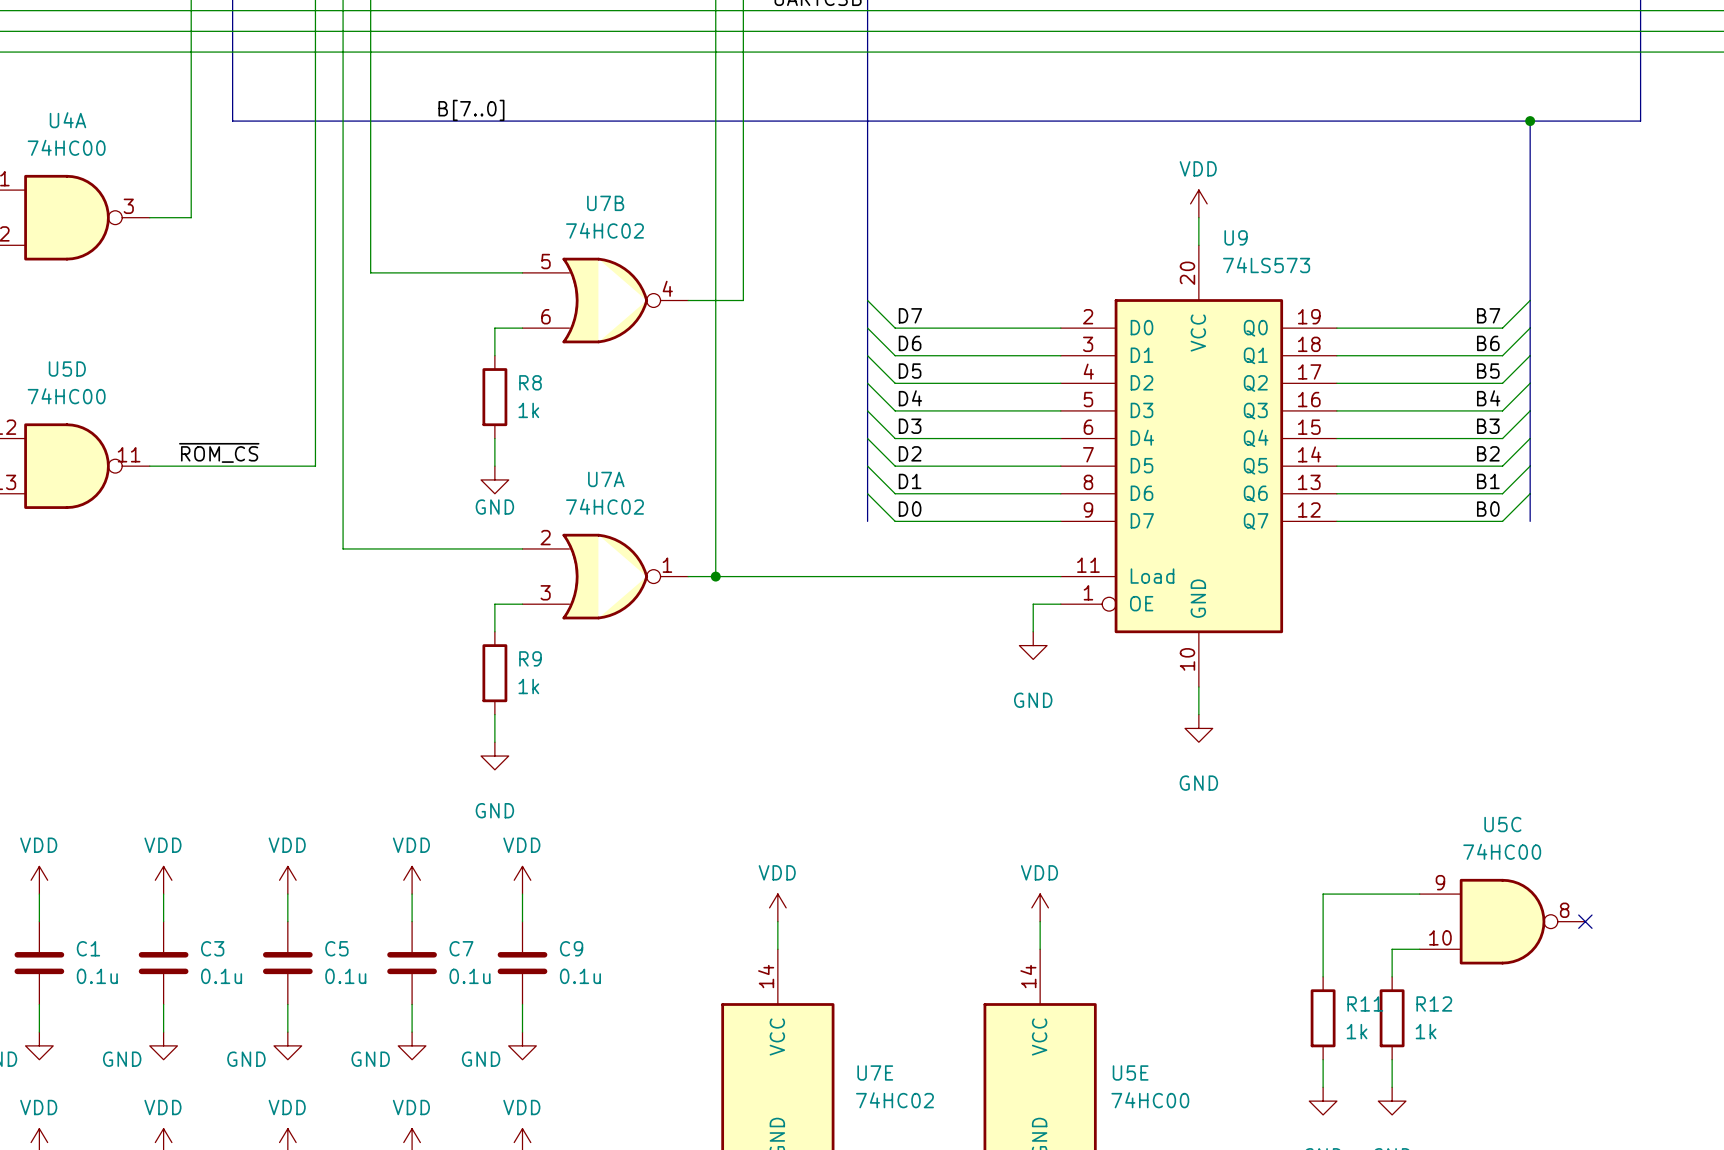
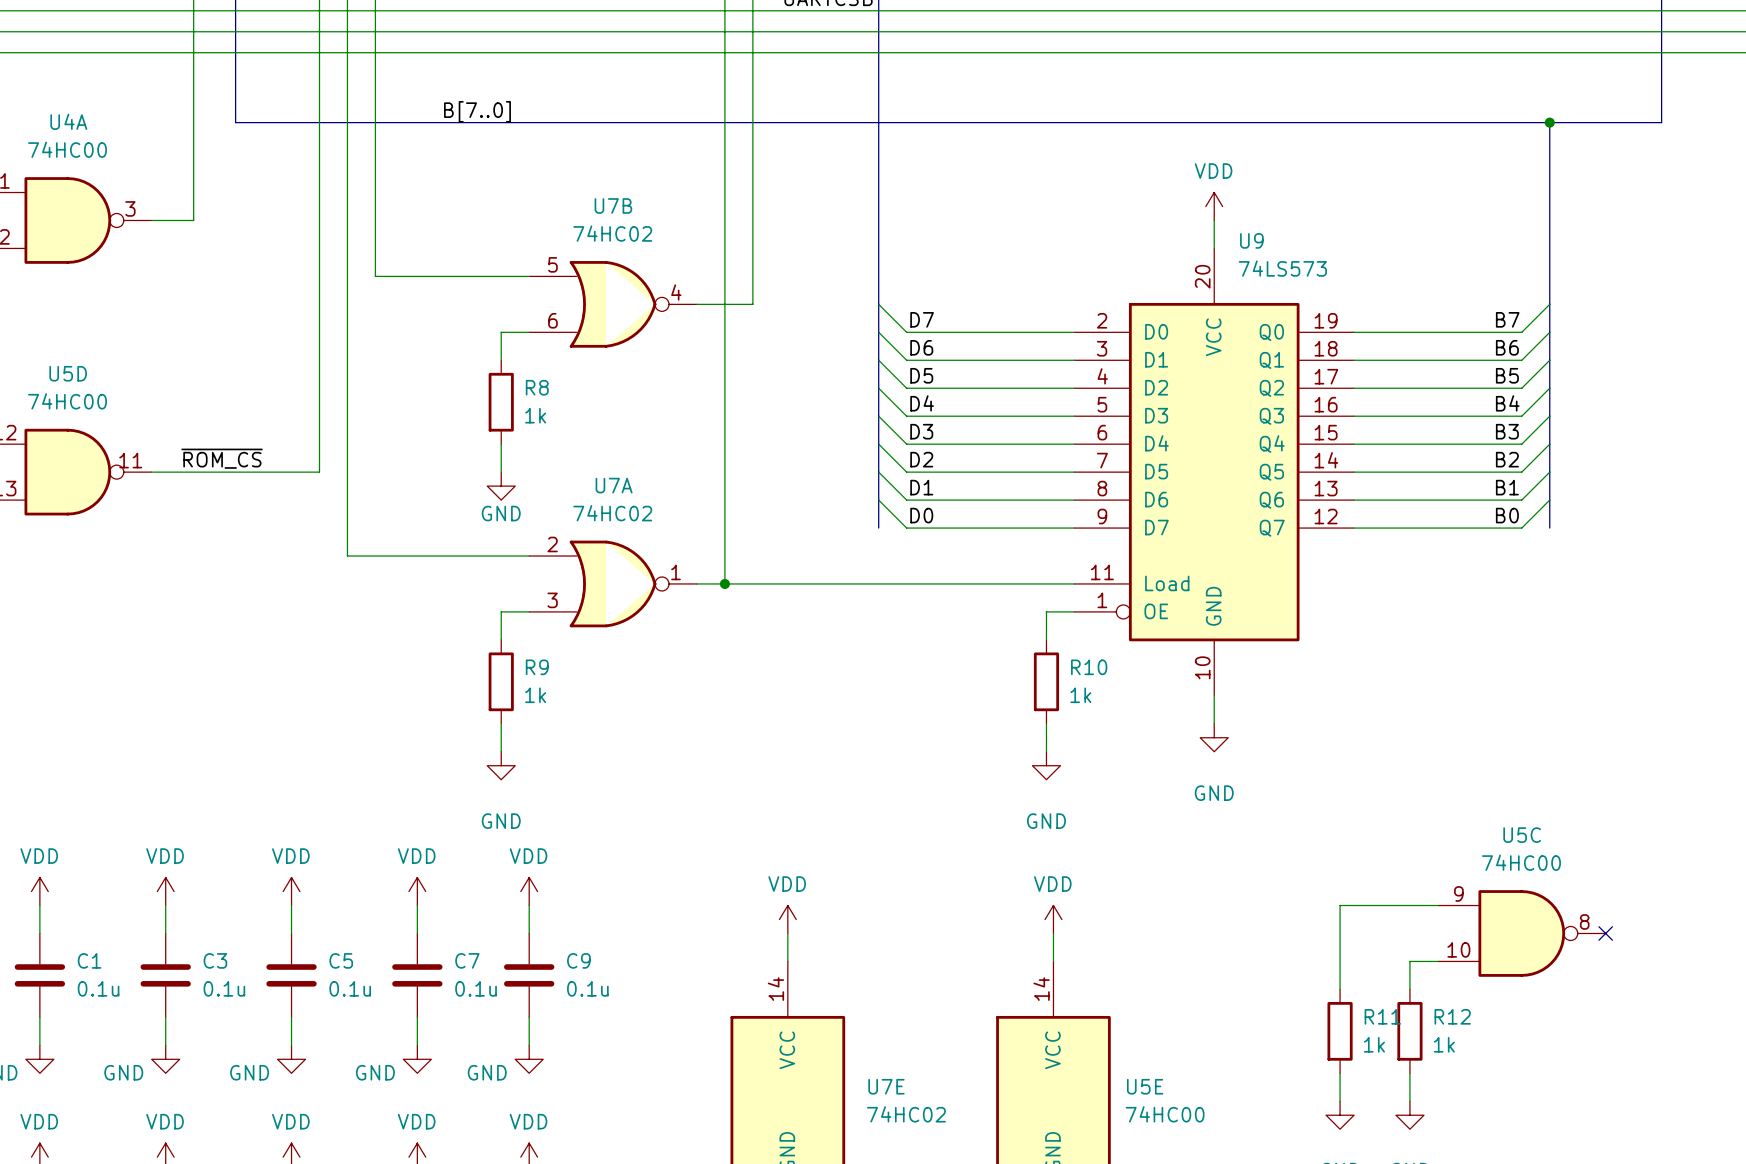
power symbol position: GND (1033, 645) -> GND (1046, 765)
R10: none -> 1k (1046, 681)
wire: none -> (1046, 723) (1046, 751)

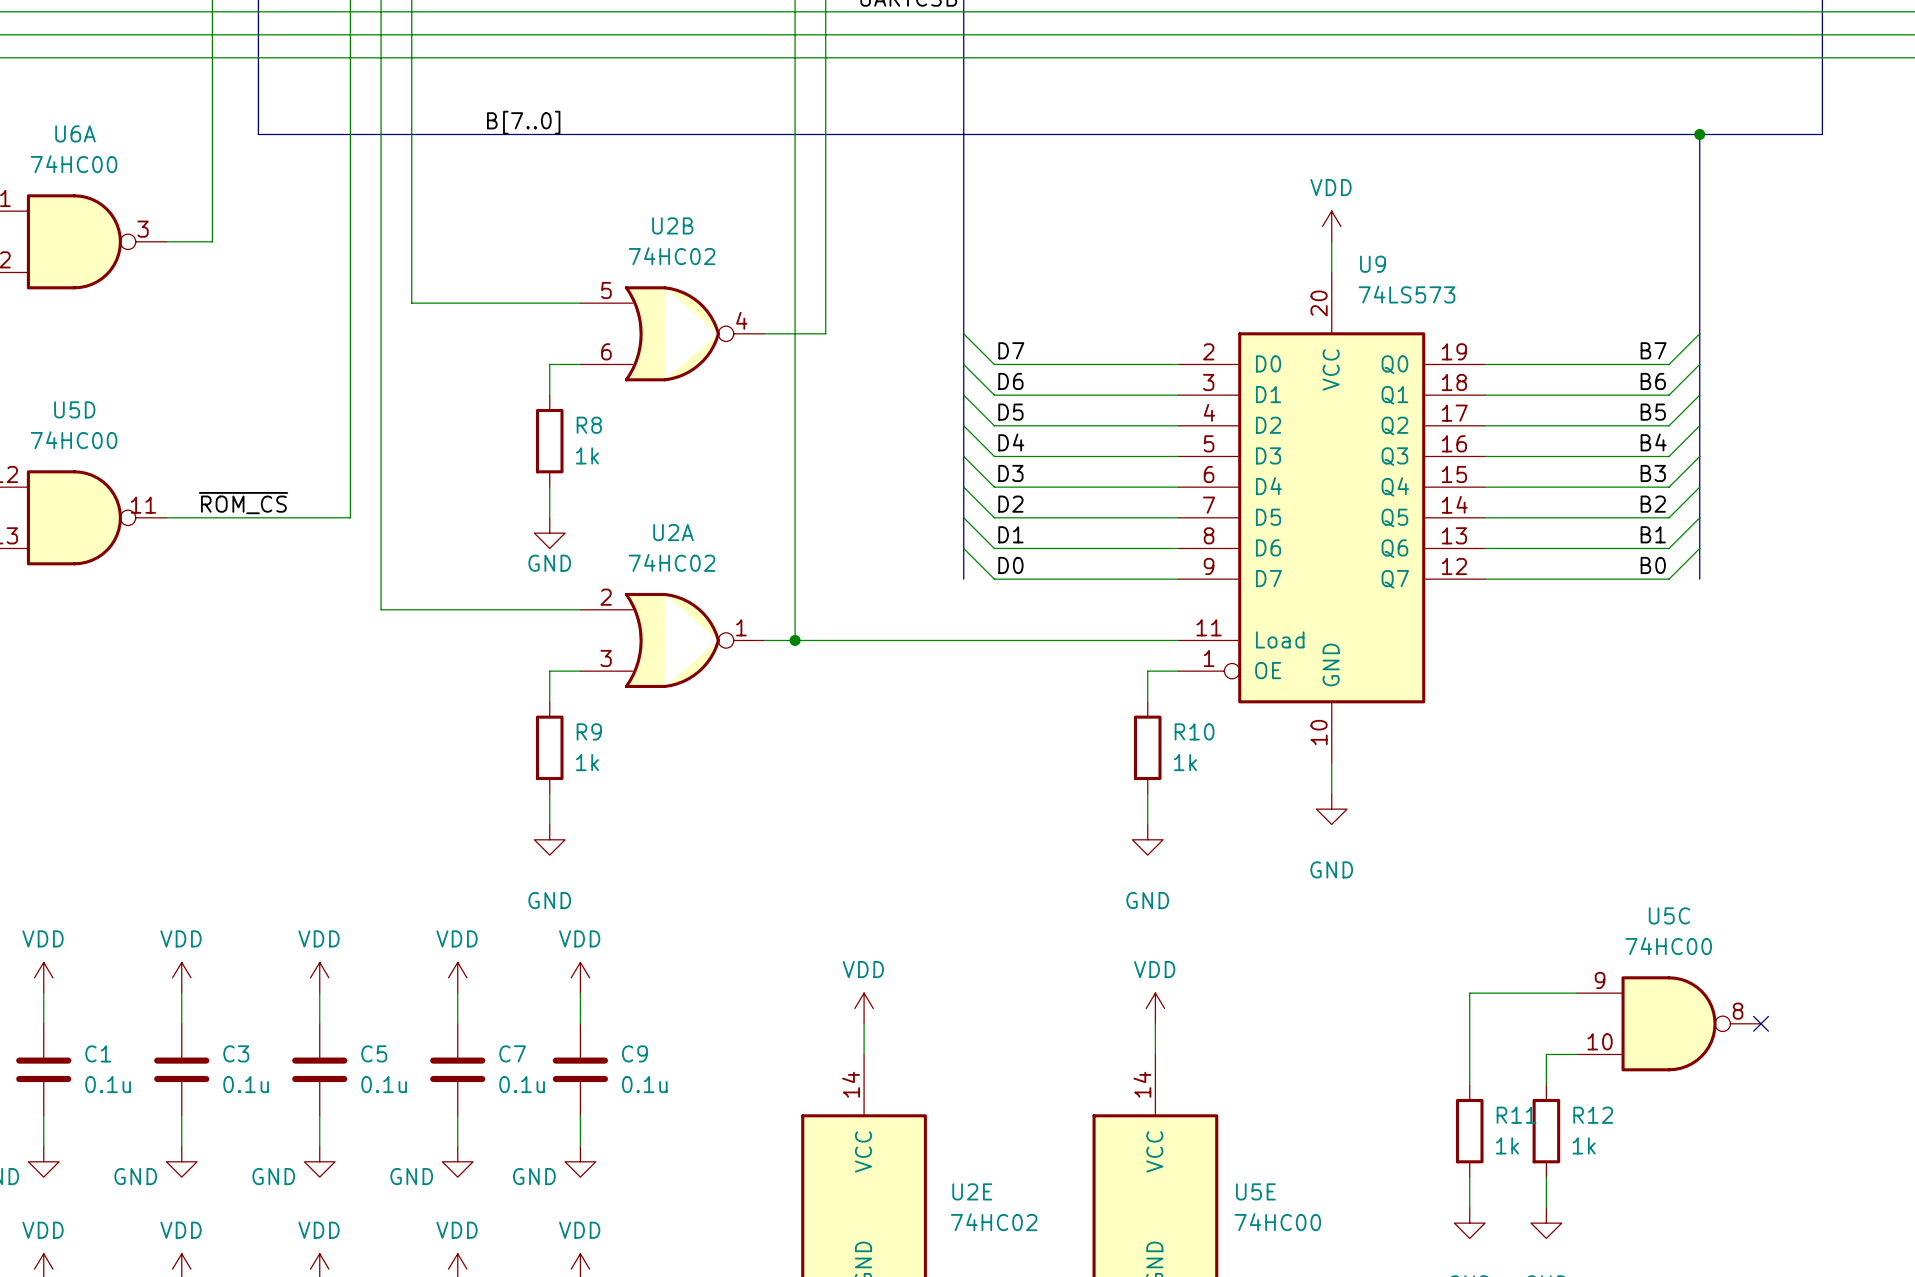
U4A name: U4A (68, 121) -> U6A (75, 133)
U7B name: U7B (613, 205) -> U2B (672, 225)
U7A name: U7A (614, 485) -> U2A (673, 532)
U7E name: U7E (886, 1086) -> U2E (972, 1191)

